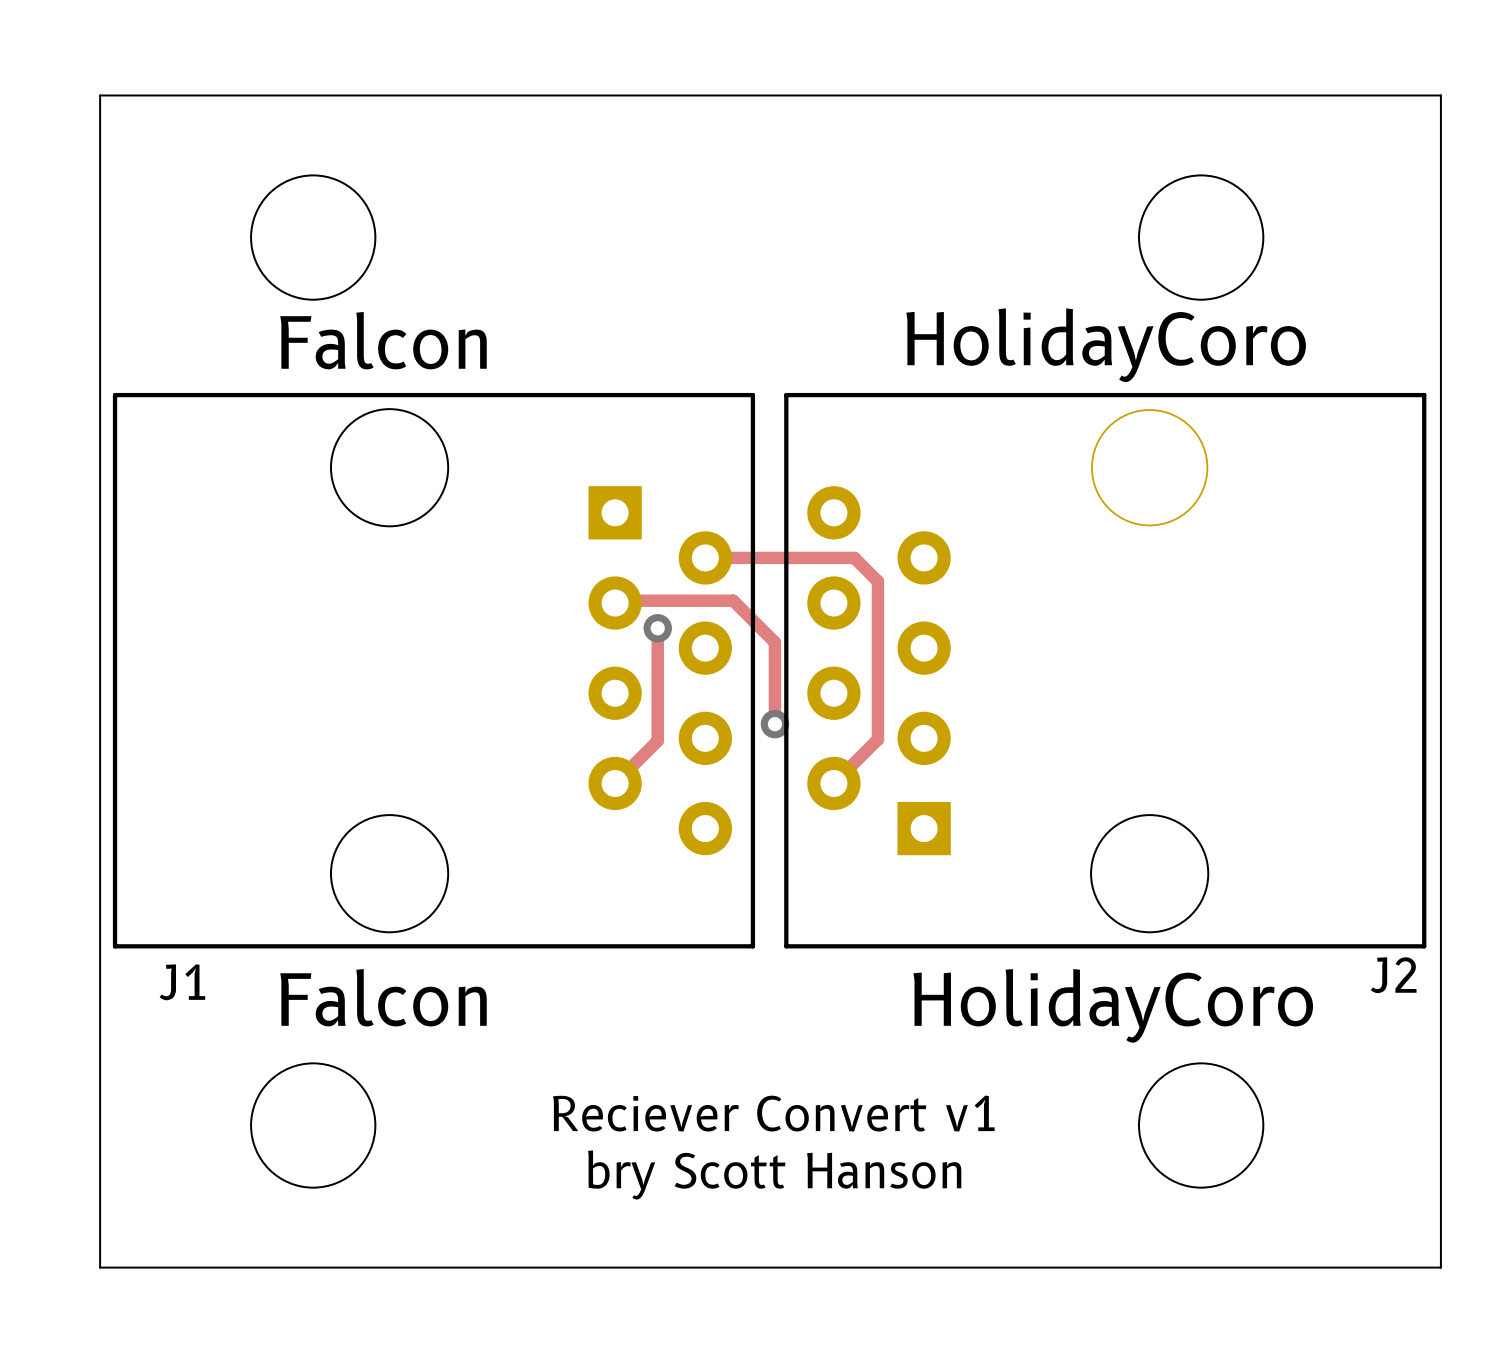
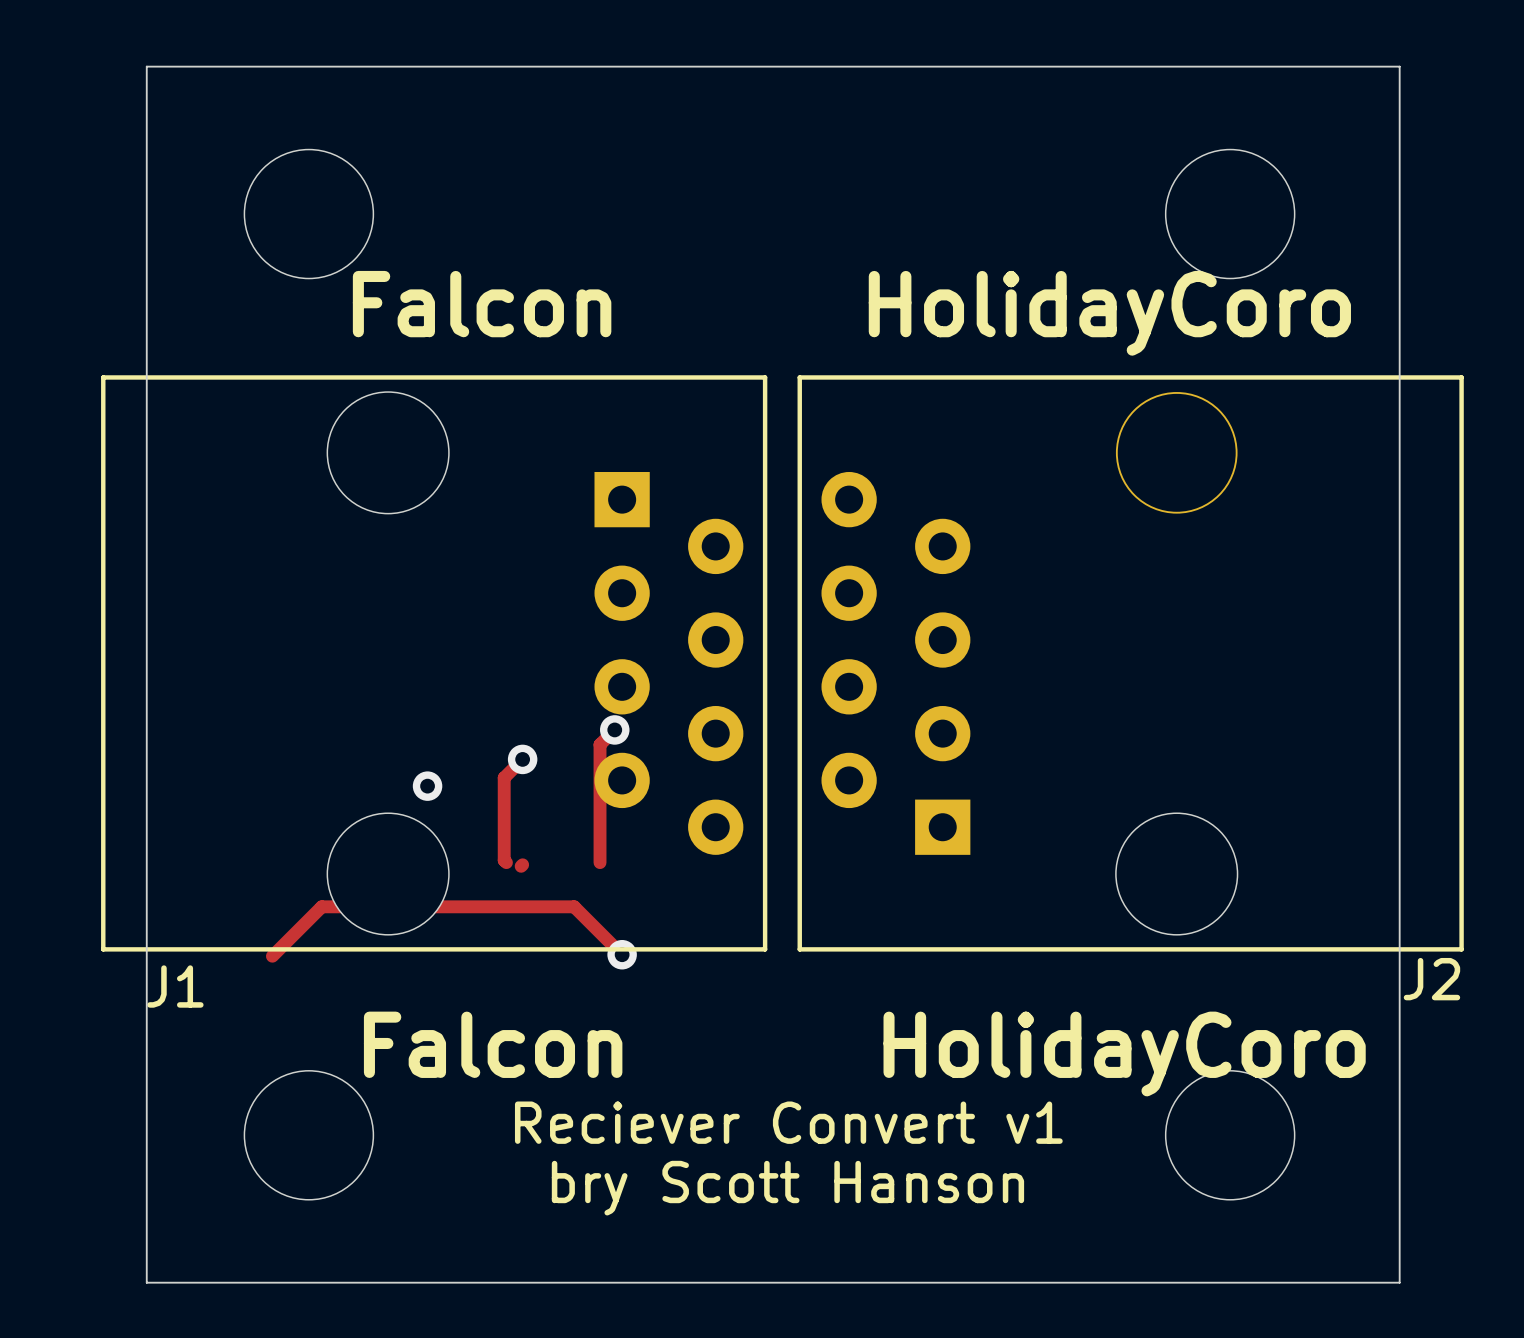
board edge: (156, 95) (100, 95) (100, 1267) (156, 1267) -> (146, 66) (146, 1282)
board edge: (1364, 95) (1440, 95) (1440, 1267) (1364, 1267) -> (1399, 66) (1399, 1282)
text position: Falcon (383, 340) -> Falcon (482, 304)
text position: HolidayCoro (1106, 345) -> HolidayCoro (1109, 313)
track: (705, 557) (854, 557) (877, 581) (877, 739) (833, 783) -> none
track: (617, 600) (733, 600) (774, 642) (774, 724) -> none
track: (657, 628) (657, 740) (615, 783) (617, 780) -> none
via: (657, 628) -> none
via: (774, 724) -> none
track: none -> (614, 729) (600, 744) (600, 862)
via: none -> (614, 729)
track: none -> (522, 759) (504, 777) (504, 860) (506, 862)
via: none -> (522, 759)
via: none -> (427, 786)
track: none -> (522, 864) (521, 866)
track: none -> (622, 954) (574, 906) (321, 906) (272, 956)
via: none -> (622, 954)
text position: Falcon (383, 997) -> Falcon (493, 1044)
text position: HolidayCoro (1113, 1005) -> HolidayCoro (1124, 1054)

